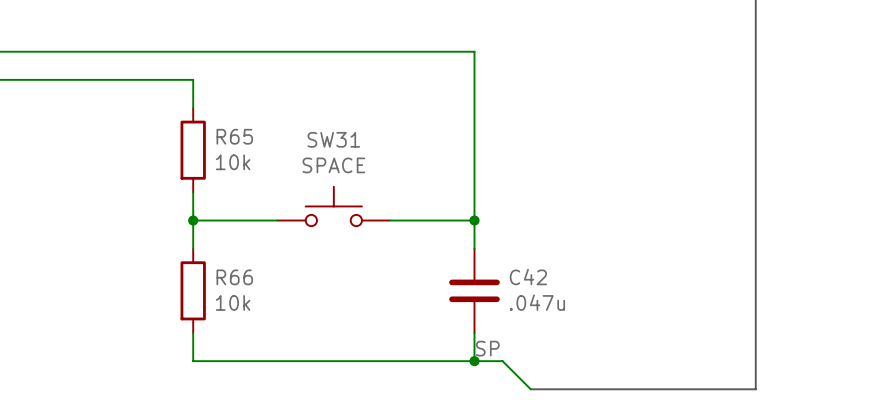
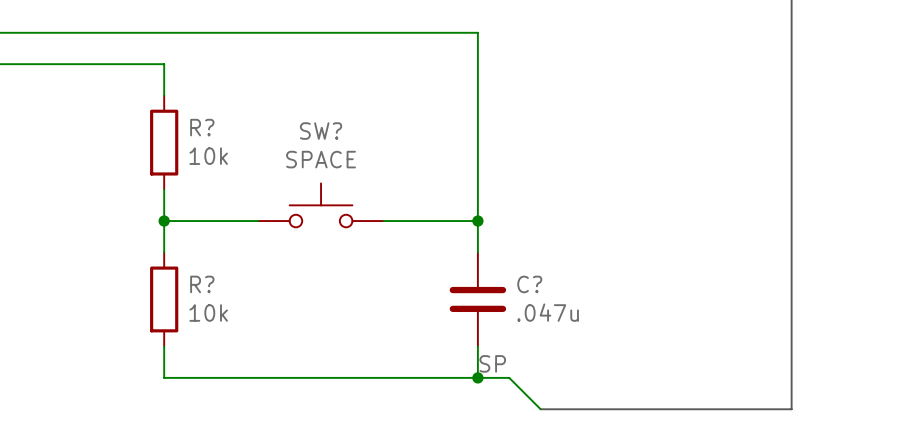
R65 name: R65 (234, 136) -> R? (202, 127)
SW31 name: SW31 (333, 139) -> SW? (321, 131)
R66 name: R66 (234, 277) -> R? (202, 284)
C42 name: C42 (528, 277) -> C? (529, 284)

